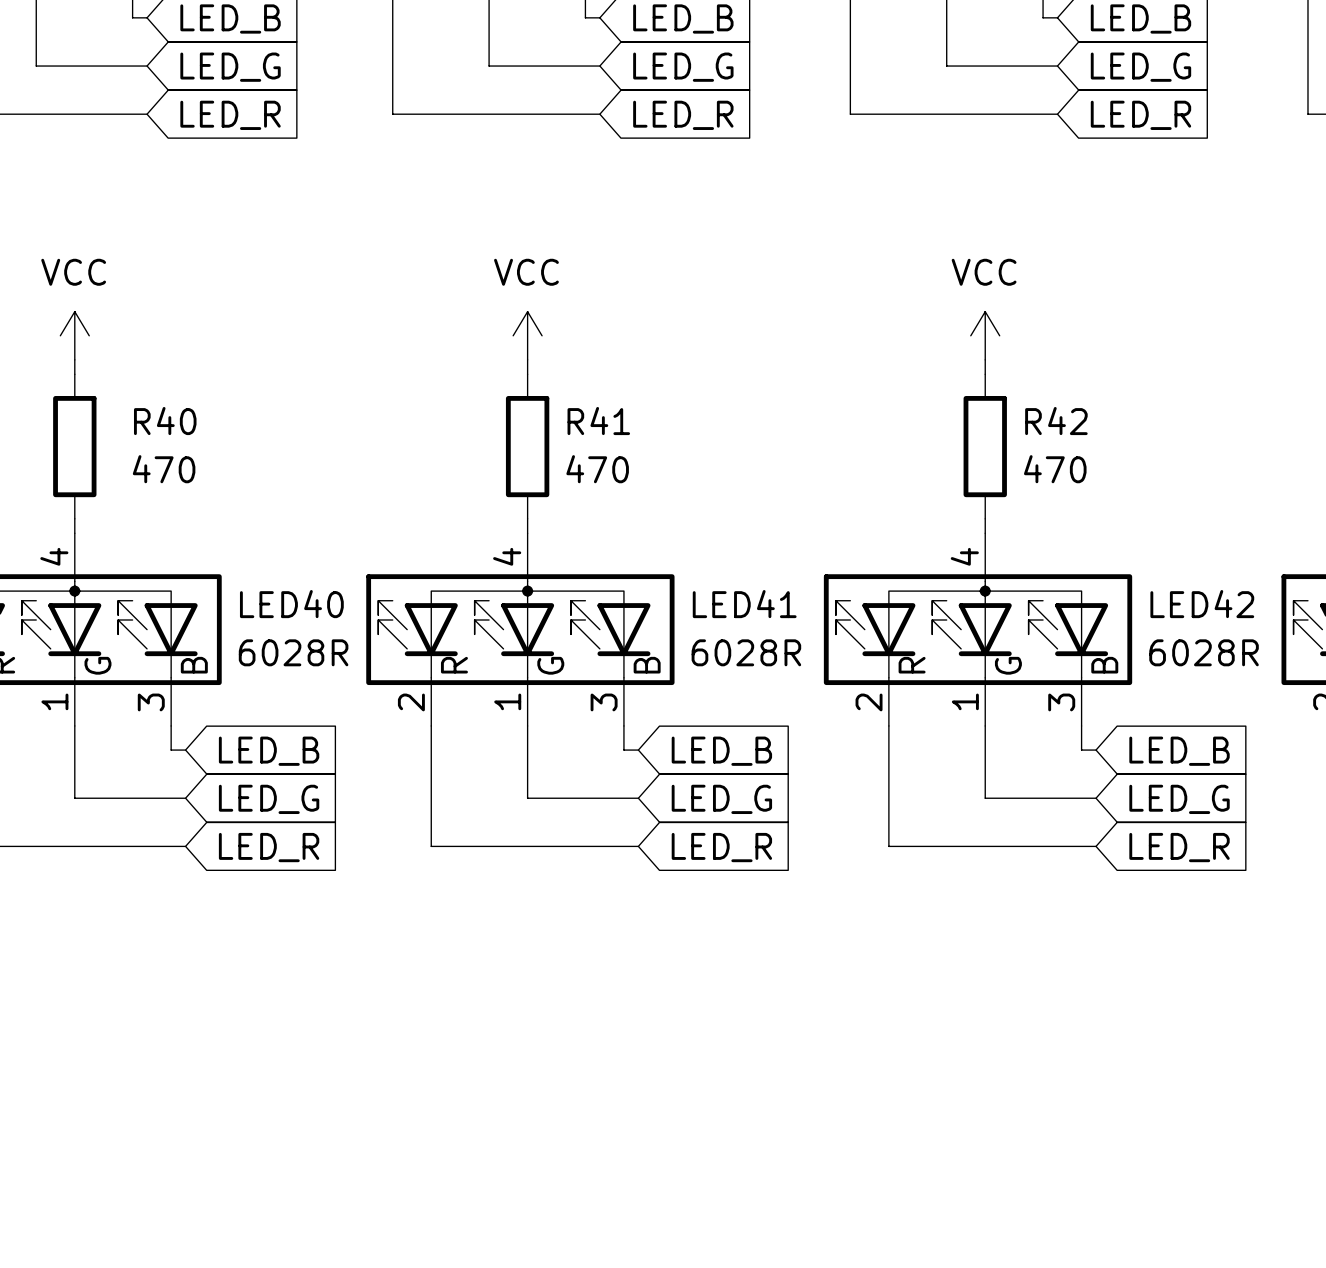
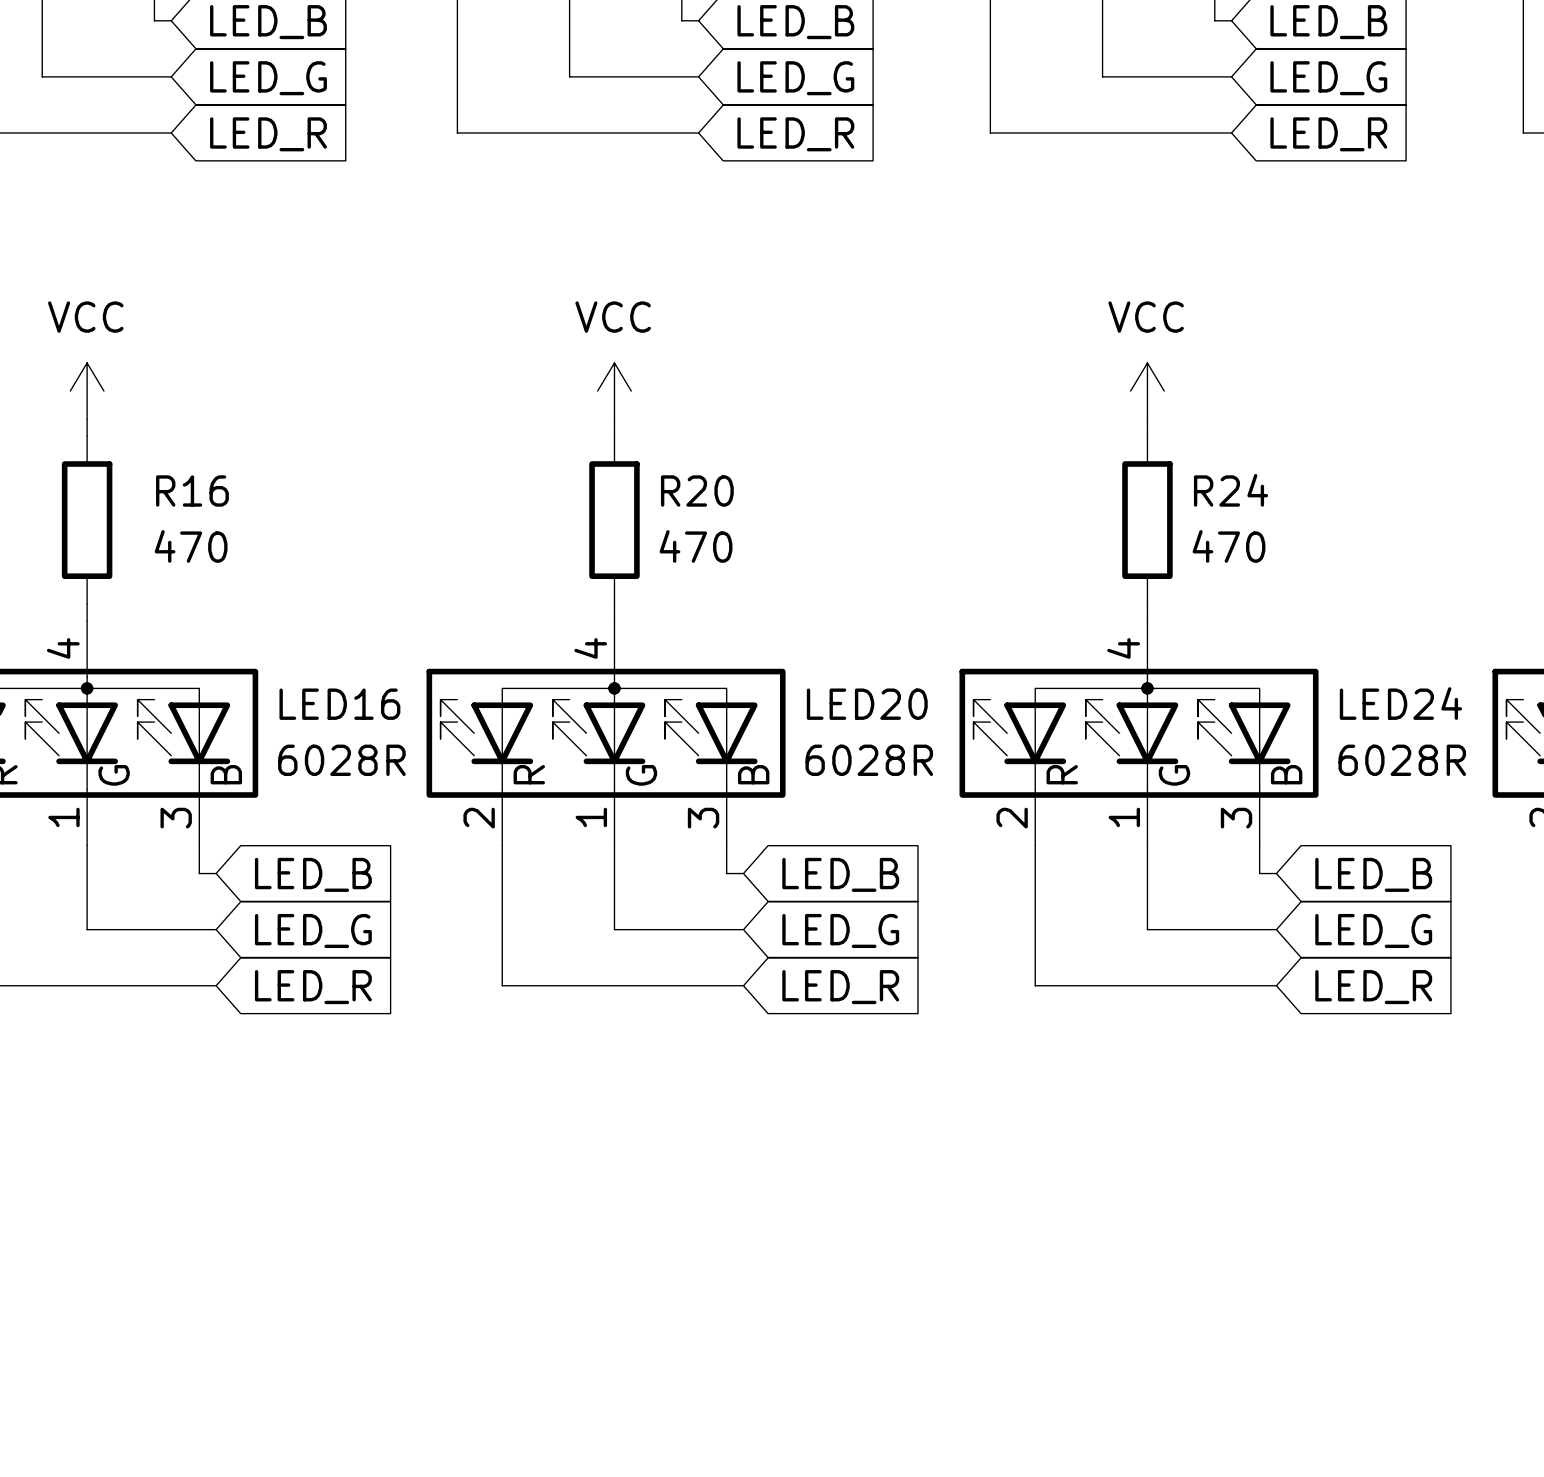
R40 name: R40 (165, 421) -> R16 (192, 491)
R41 name: R41 (598, 421) -> R20 (697, 491)
R42 name: R42 (1056, 421) -> R24 (1231, 490)
LED40 name: LED40 (291, 604) -> LED16 (339, 704)
LED41 name: LED41 (744, 604) -> LED20 (867, 704)
LED42 name: LED42 (1202, 604) -> LED24 (1400, 703)

